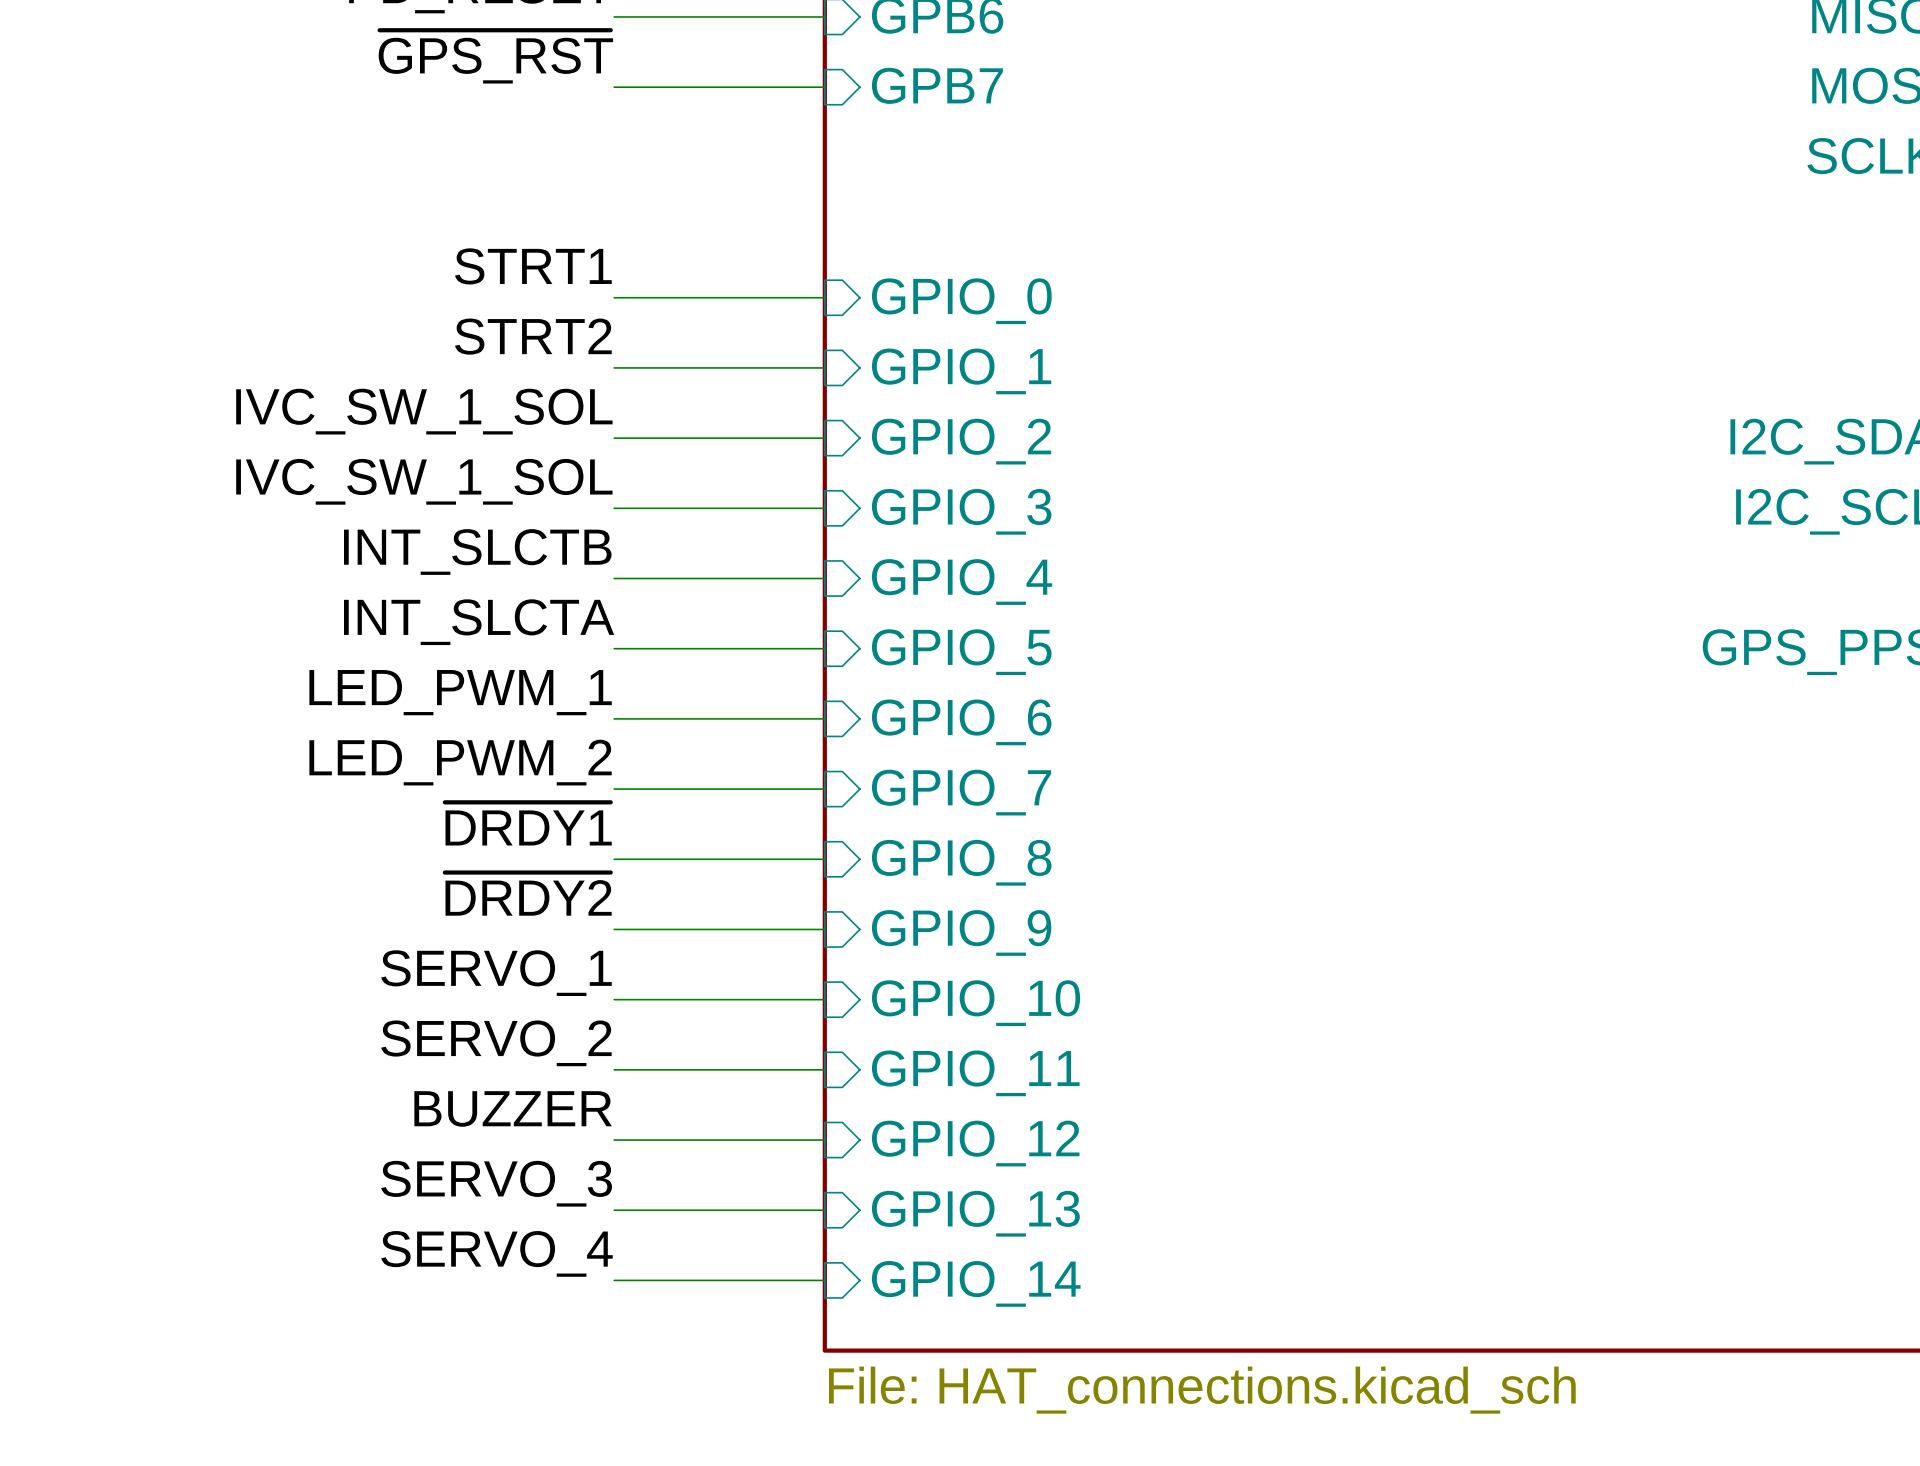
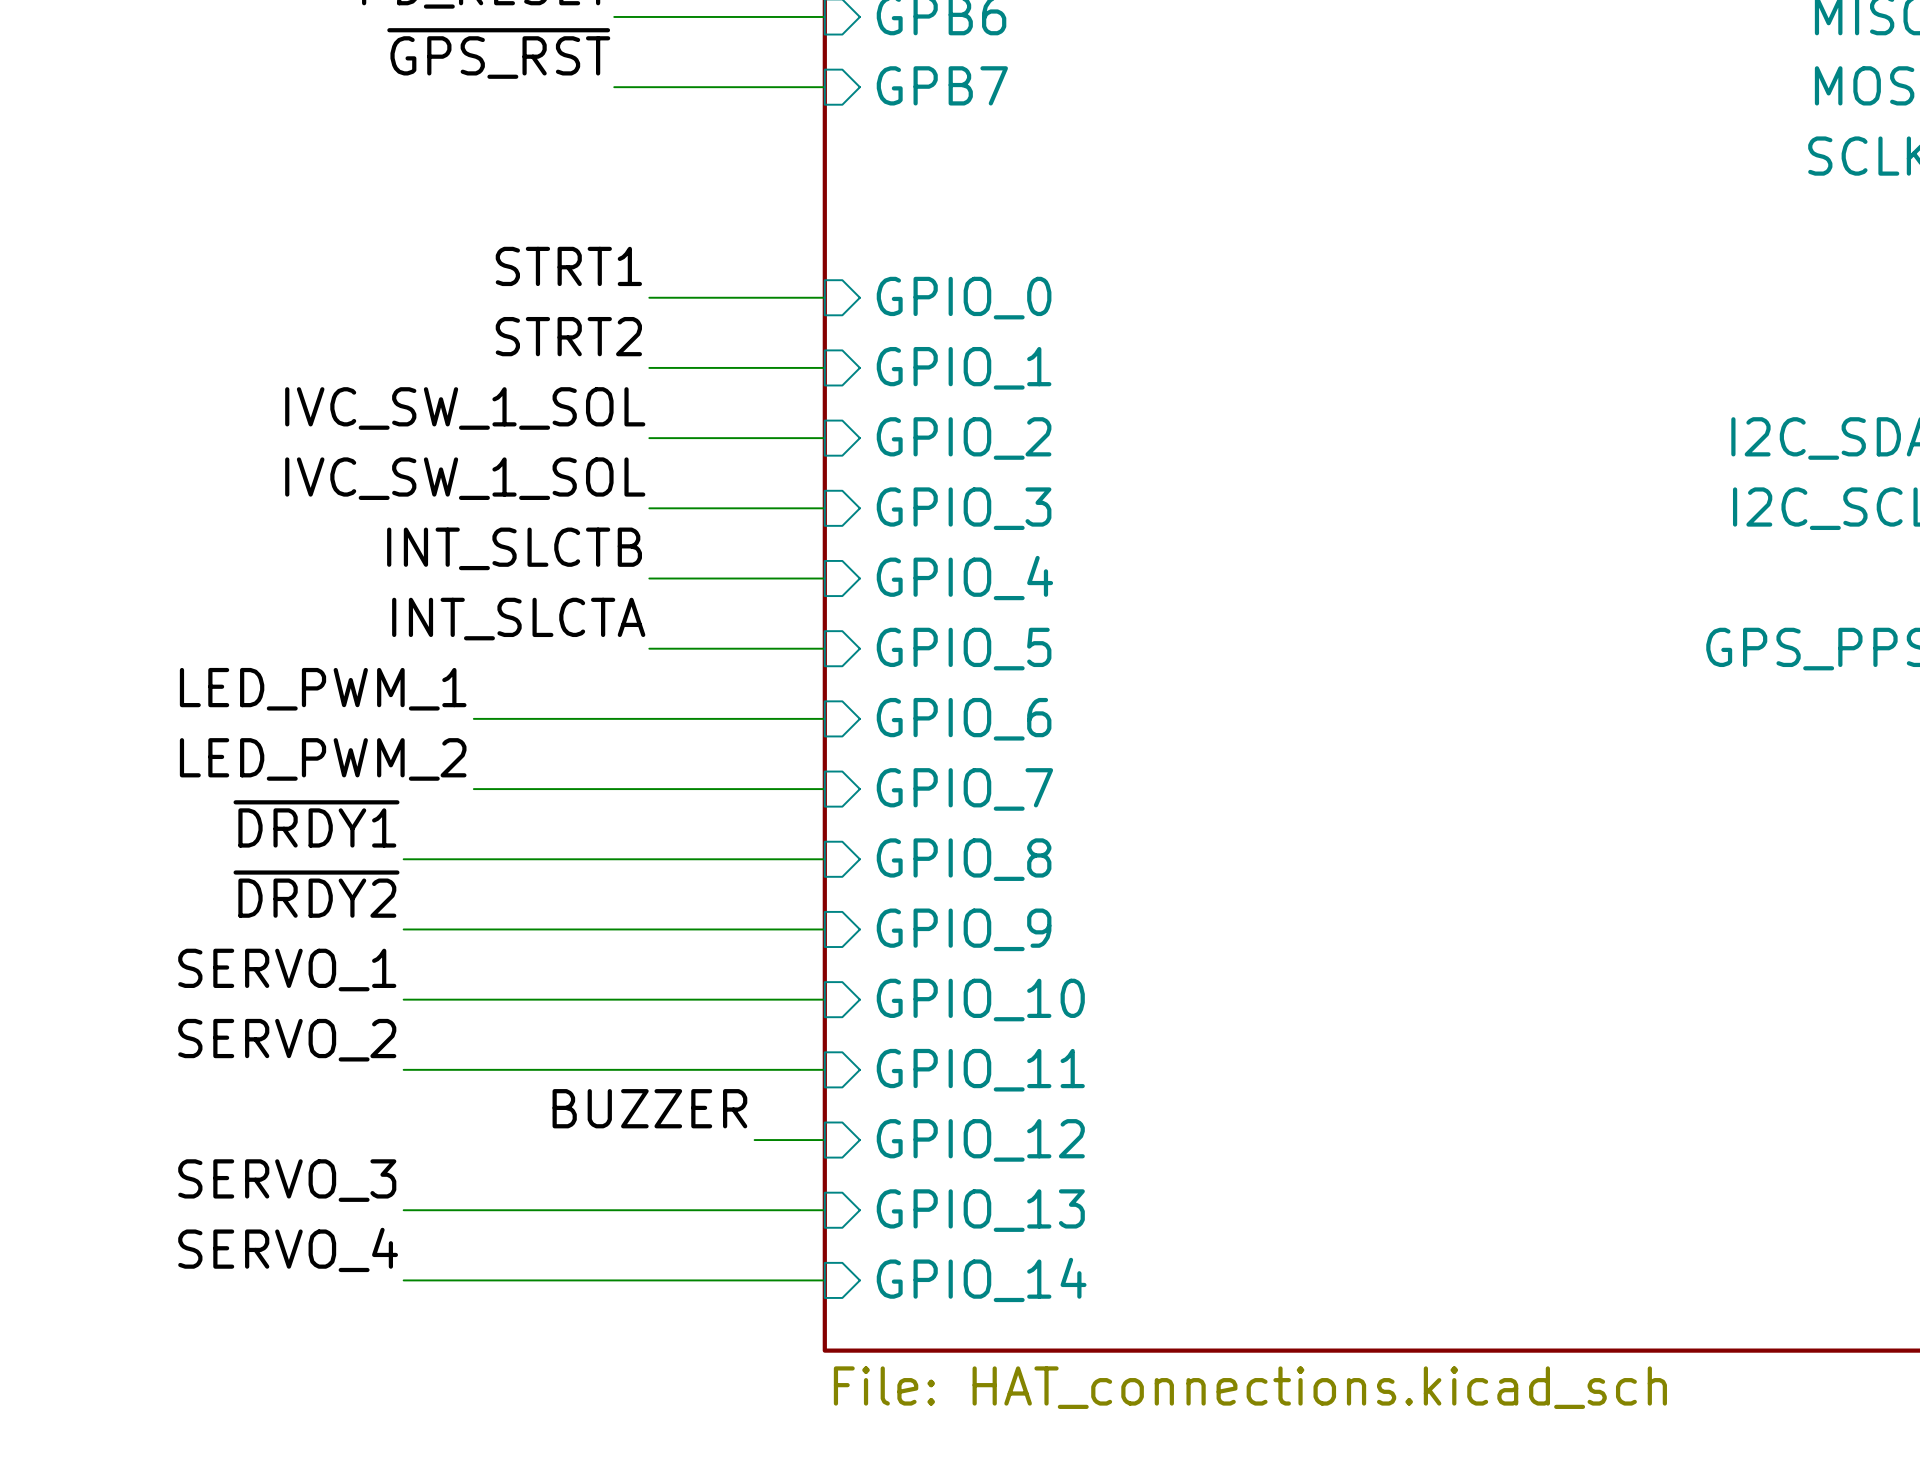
label position: STRT1 (533, 266) -> STRT1 (568, 266)
wire: (614, 297) (649, 297) -> none
label position: STRT2 (533, 336) -> STRT2 (568, 336)
wire: (614, 367) (649, 367) -> none
label position: IVC_SW_1_SOL (424, 411) -> IVC_SW_1_SOL (465, 408)
wire: (614, 438) (649, 438) -> none
label position: IVC_SW_1_SOL (424, 481) -> IVC_SW_1_SOL (465, 478)
wire: (614, 508) (649, 508) -> none
label position: INT_SLCTB (477, 552) -> INT_SLCTB (514, 548)
wire: (614, 578) (649, 578) -> none
label position: INT_SLCTA (479, 622) -> INT_SLCTA (518, 619)
wire: (614, 648) (649, 648) -> none
label position: LED_PWM_1 (460, 692) -> LED_PWM_1 (323, 689)
wire: none -> (473, 718) (614, 718)
label position: LED_PWM_2 (460, 762) -> LED_PWM_2 (323, 759)
label position: ~{DRDY1} (528, 823) -> ~{DRDY1} (316, 823)
wire: none -> (403, 859) (614, 859)
label position: ~{DRDY2} (528, 894) -> ~{DRDY2} (316, 894)
wire: none -> (403, 929) (614, 929)
label position: SERVO_1 (496, 973) -> SERVO_1 (287, 970)
wire: none -> (403, 999) (614, 999)
label position: SERVO_2 (496, 1043) -> SERVO_2 (287, 1040)
wire: none -> (403, 1069) (614, 1069)
label position: BUZZER (513, 1108) -> BUZZER (649, 1108)
wire: (614, 1140) (754, 1140) -> (473, 789) (614, 789)
label position: SERVO_3 (496, 1183) -> SERVO_3 (287, 1180)
wire: none -> (403, 1210) (614, 1210)
label position: SERVO_4 (496, 1253) -> SERVO_4 (288, 1249)
wire: none -> (403, 1280) (614, 1280)

